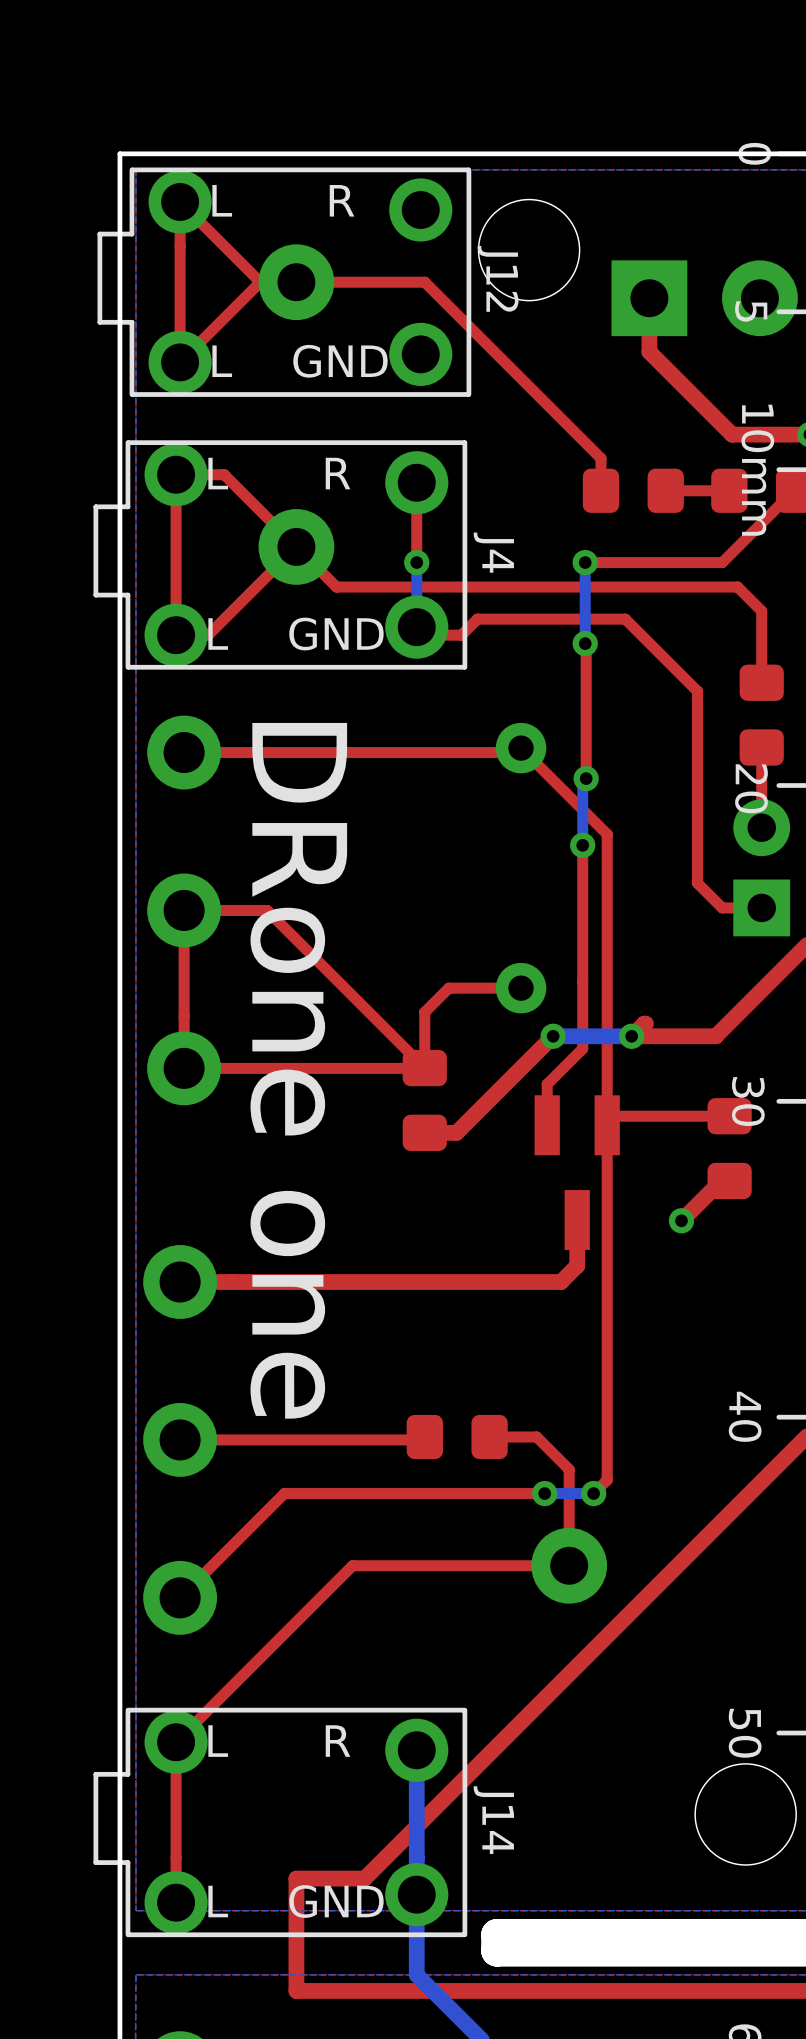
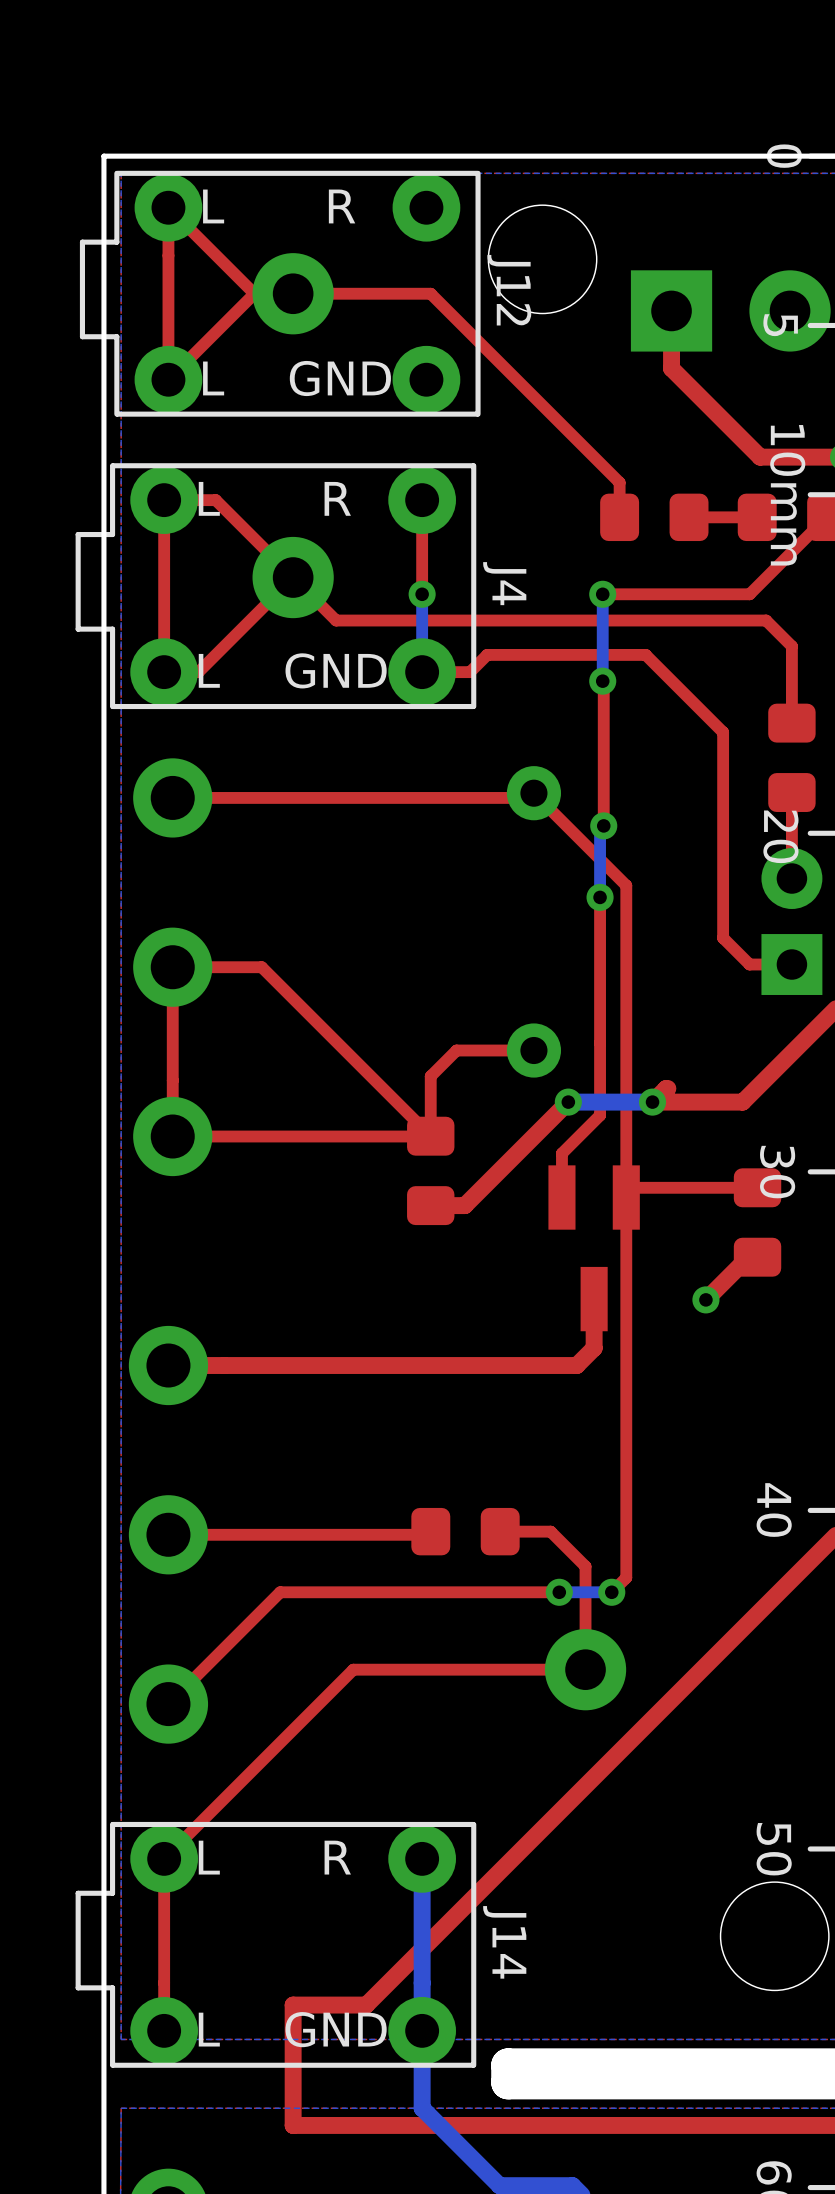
J12 footprint: [97, 167, 472, 397] -> [79, 170, 481, 417]
J4 footprint: [93, 440, 468, 670] -> [75, 463, 477, 710]
text: DRone one (298, 1070) -> none
J14 footprint: [93, 1707, 468, 1938] -> [75, 1821, 477, 2068]

